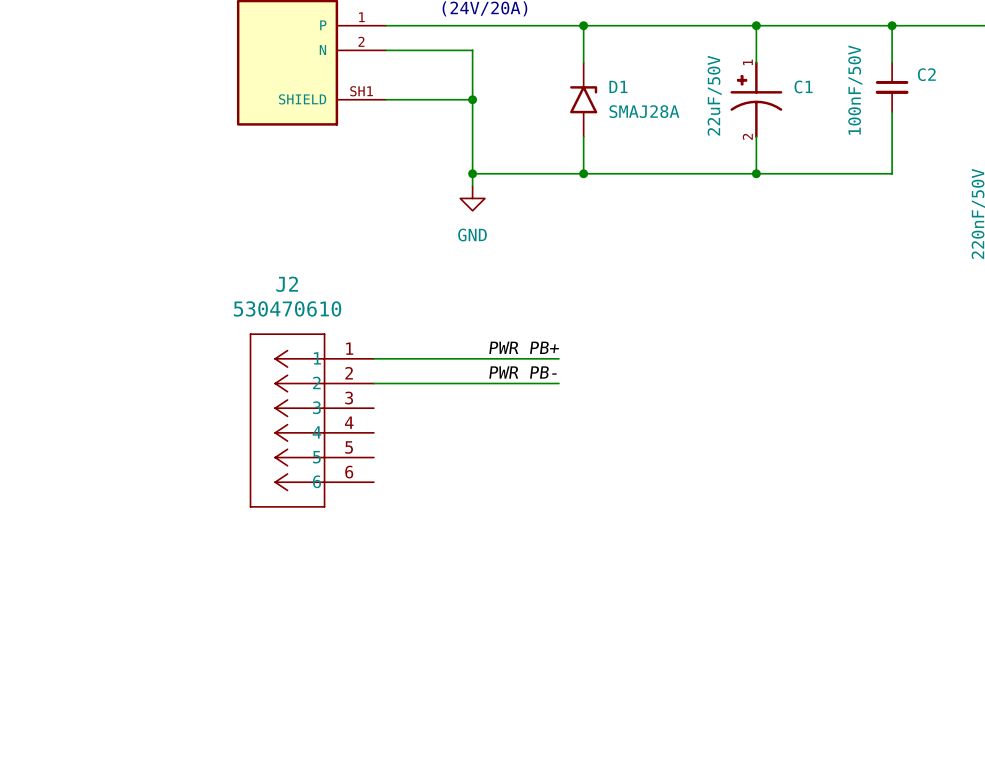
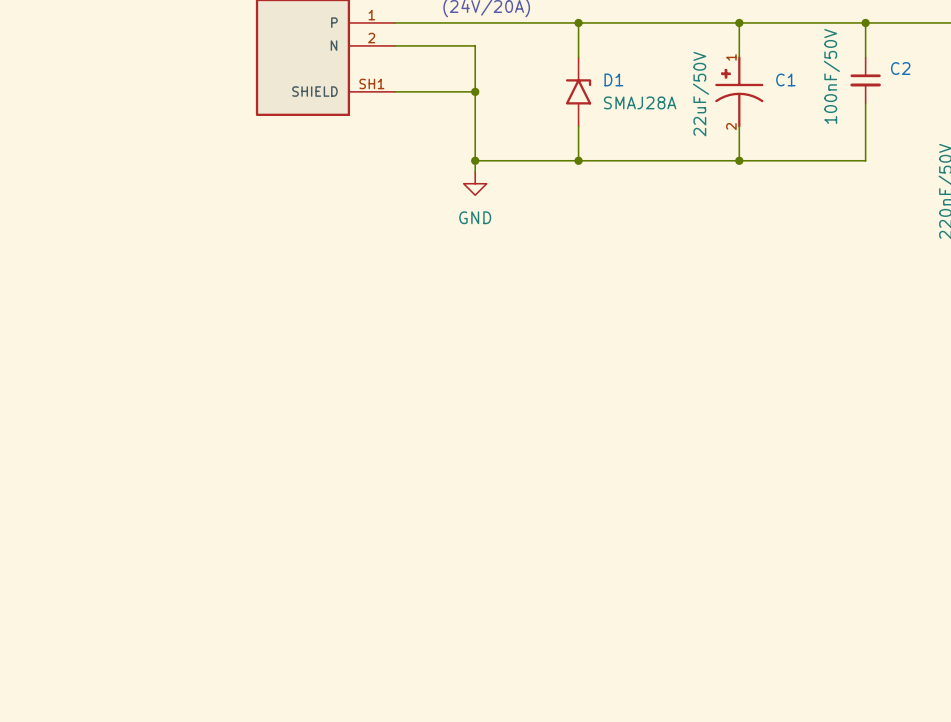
label: PWR PB+ (524, 347) -> none
wire: (373, 358) (558, 358) -> none
label: PWR PB- (522, 372) -> none
wire: (373, 383) (558, 383) -> none
J2: 530470610 (311, 420) -> none

